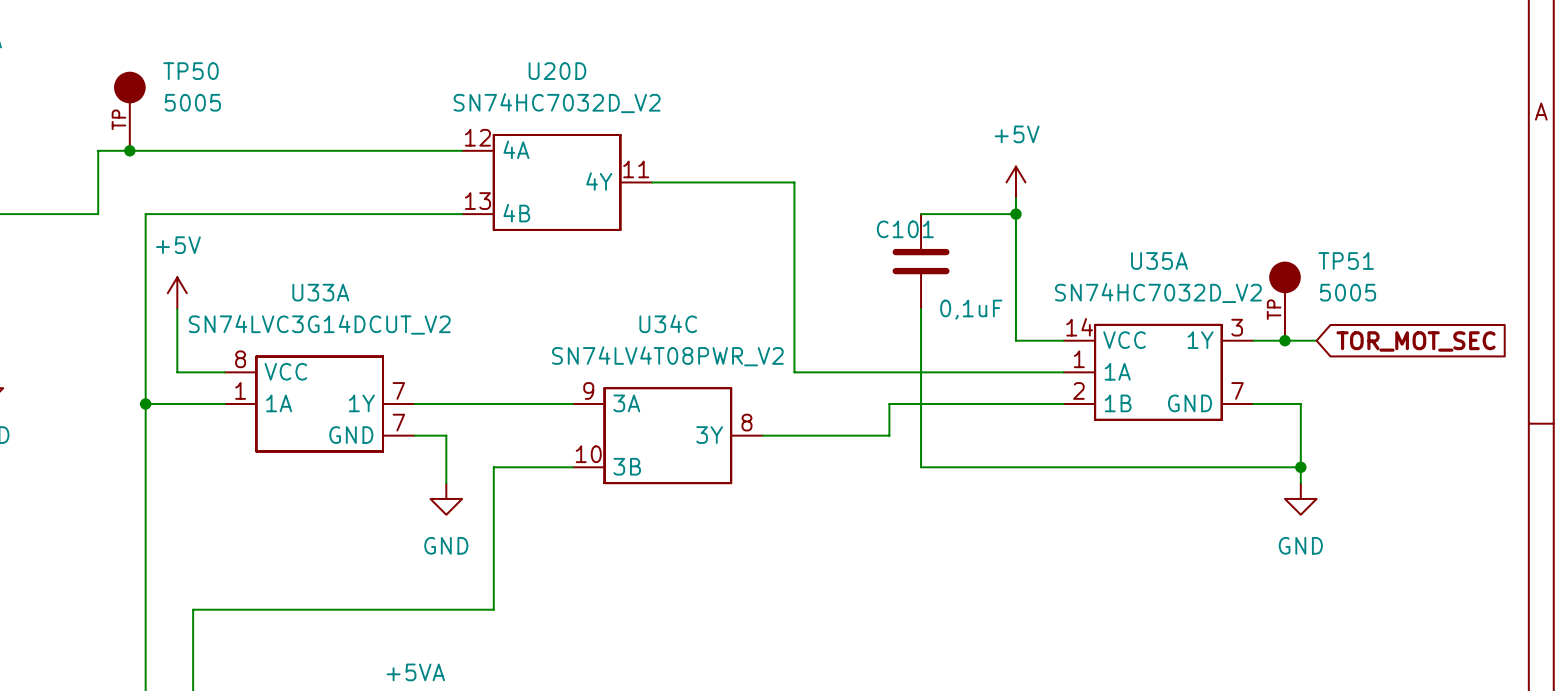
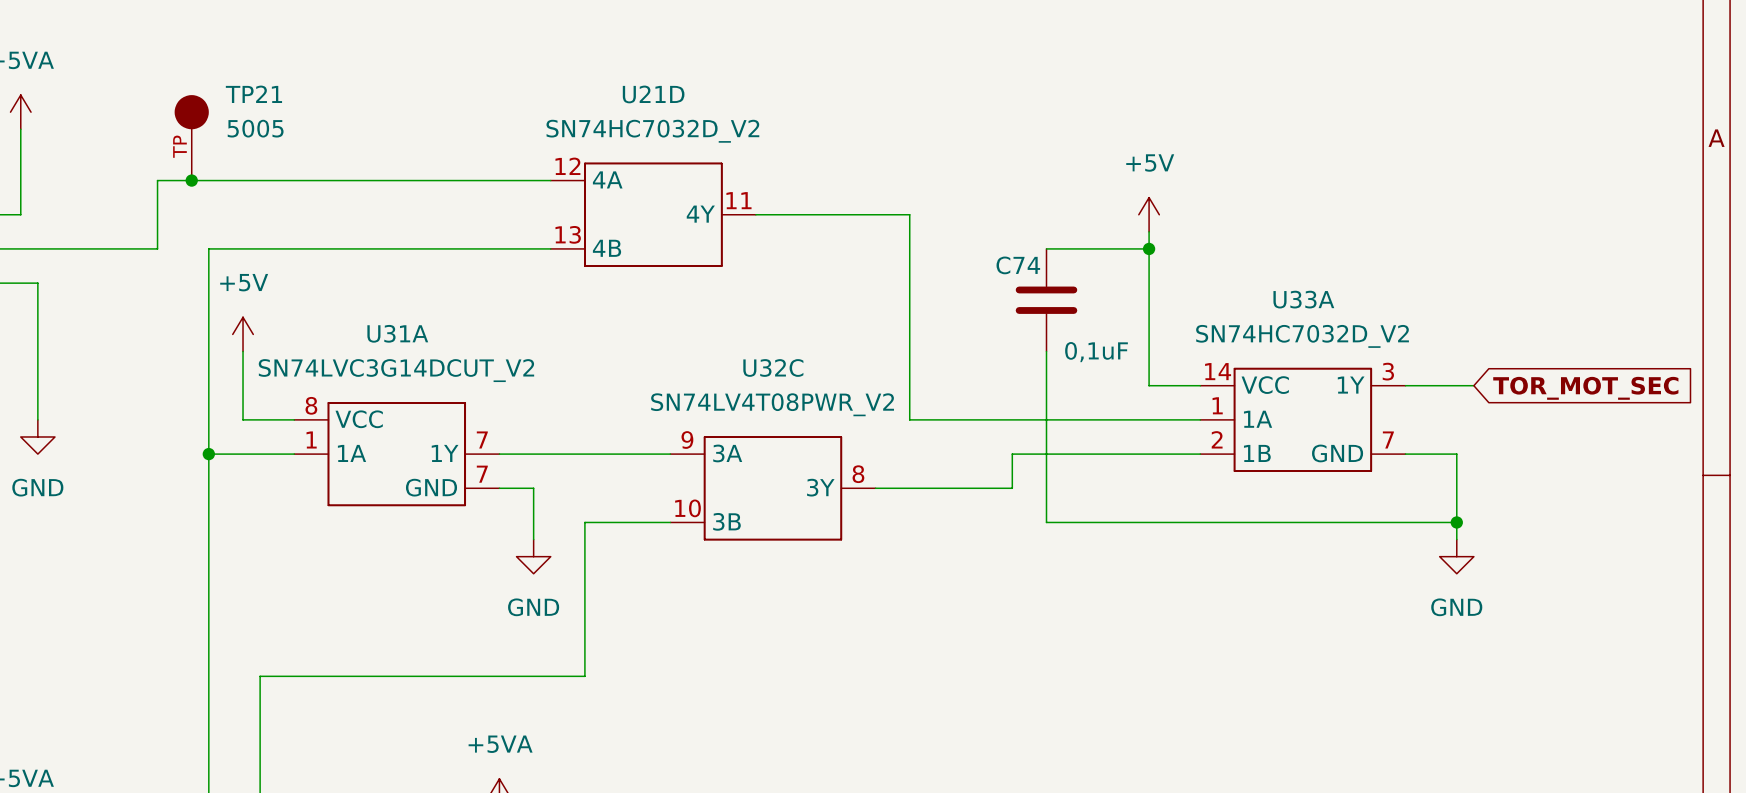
TP50 name: TP50 (190, 71) -> TP21 (253, 94)
U20D name: U20D (557, 71) -> U21D (653, 94)
C101 name: C101 (905, 229) -> C74 (1018, 265)
U35A name: U35A (1159, 260) -> U33A (1303, 299)
U33A name: U33A (320, 292) -> U31A (397, 333)
TP51: 5005 (1284, 301) -> none
U34C name: U34C (668, 323) -> U32C (773, 367)
junction: (1284, 340) -> none

